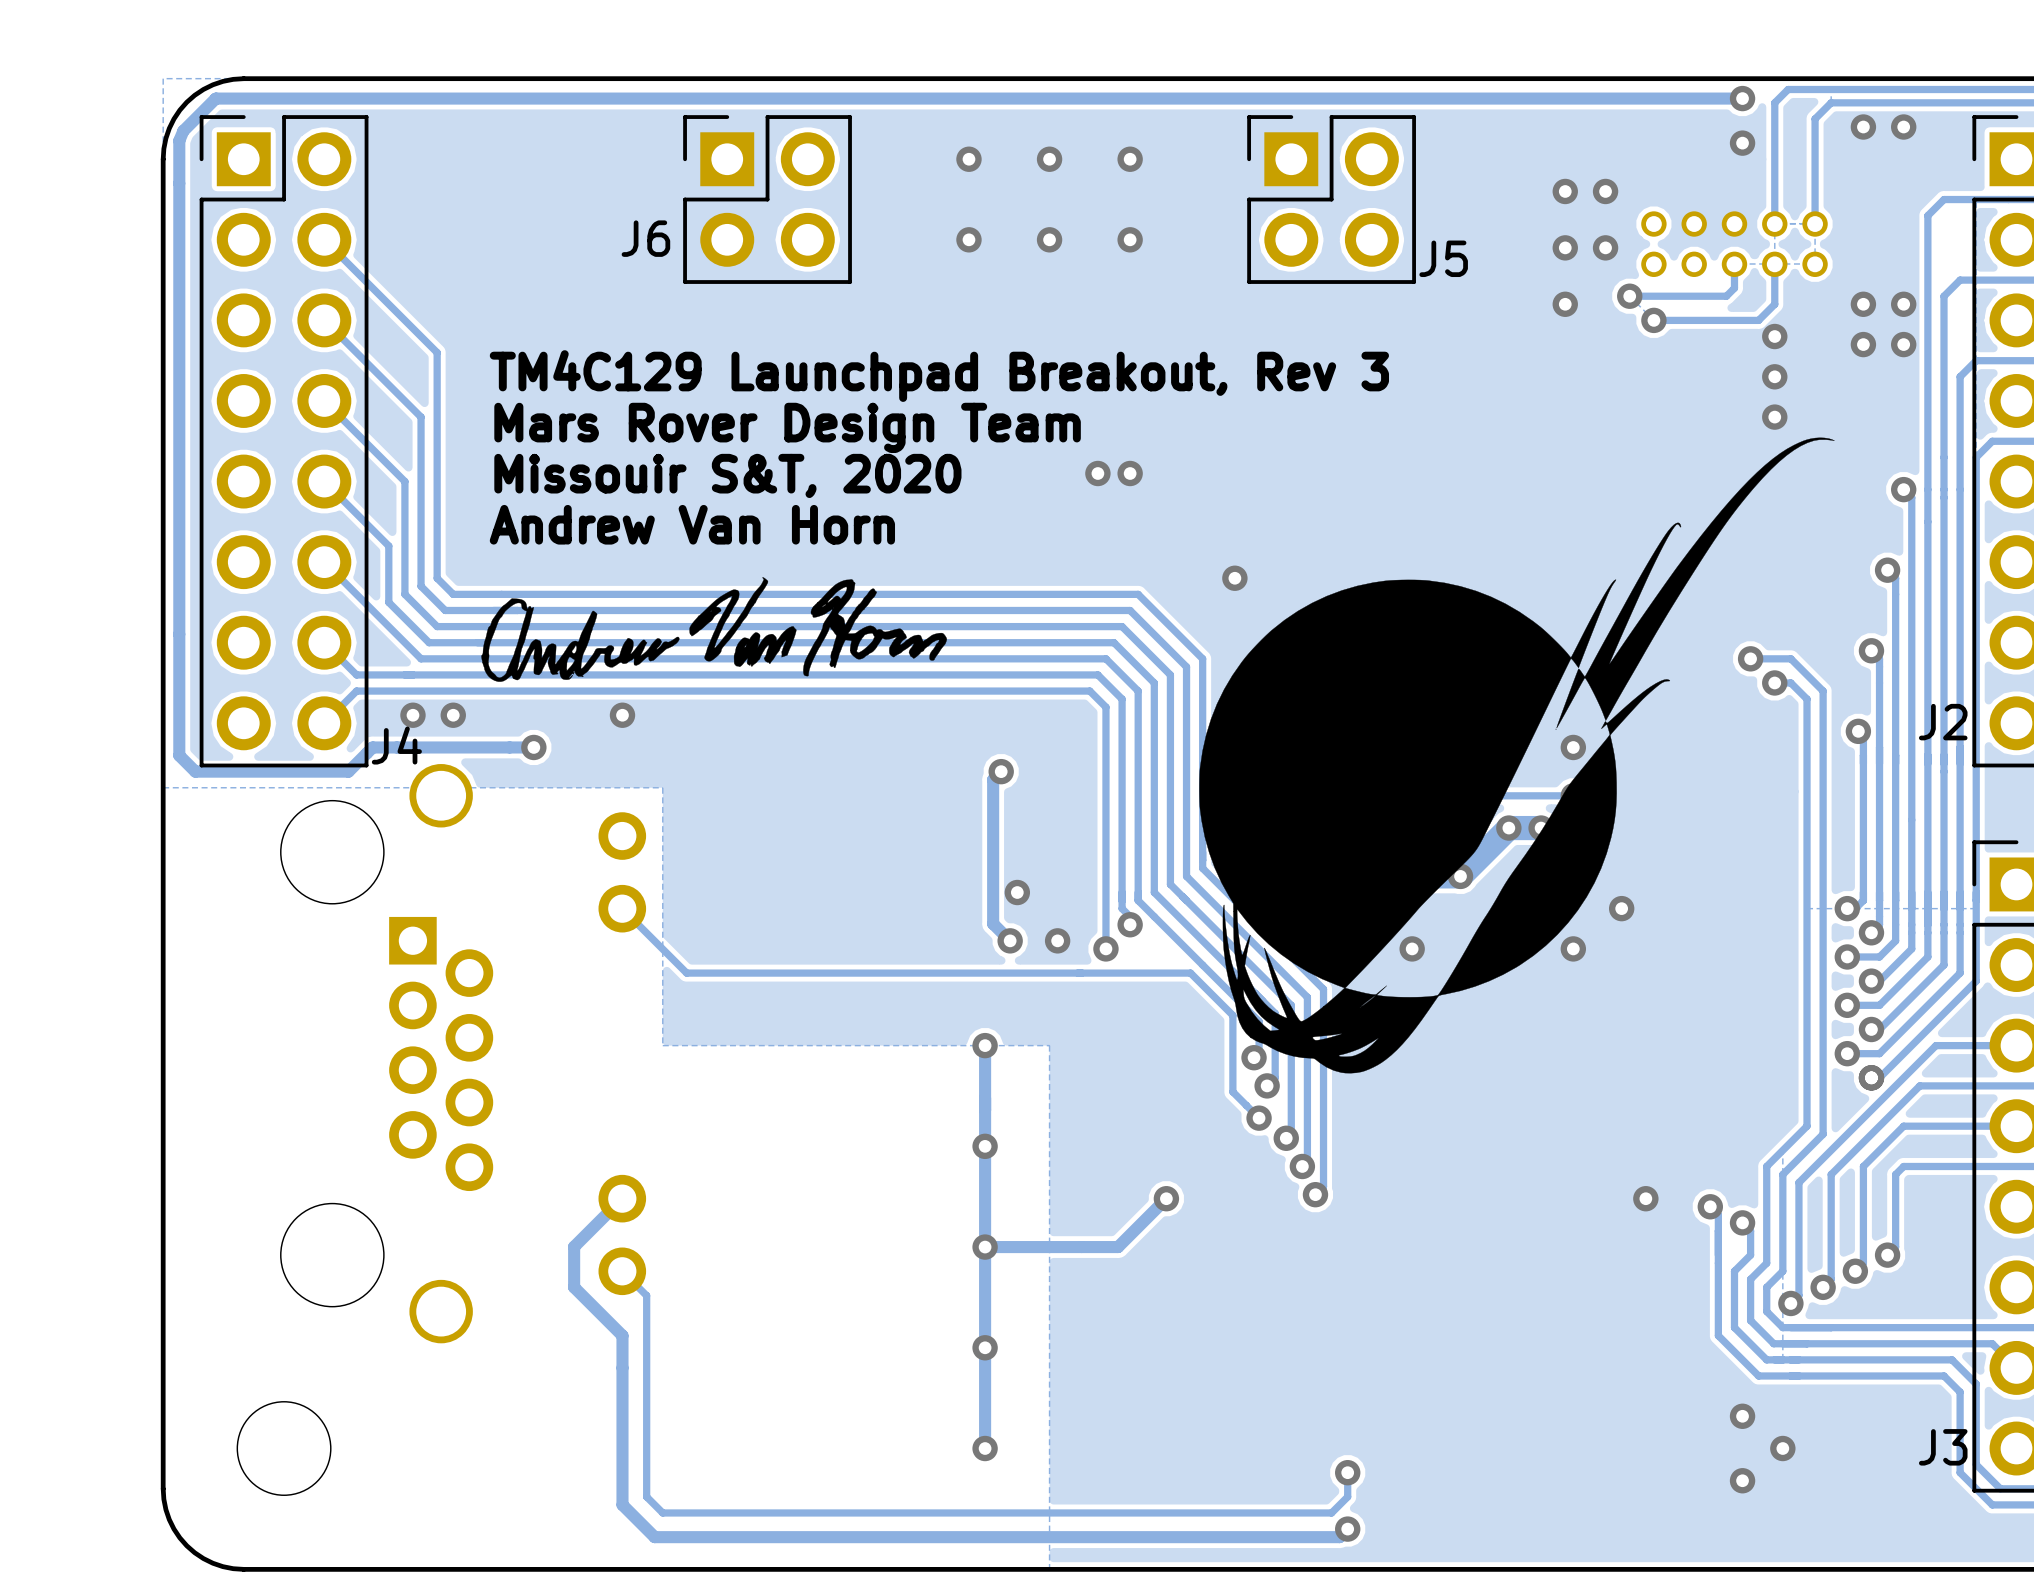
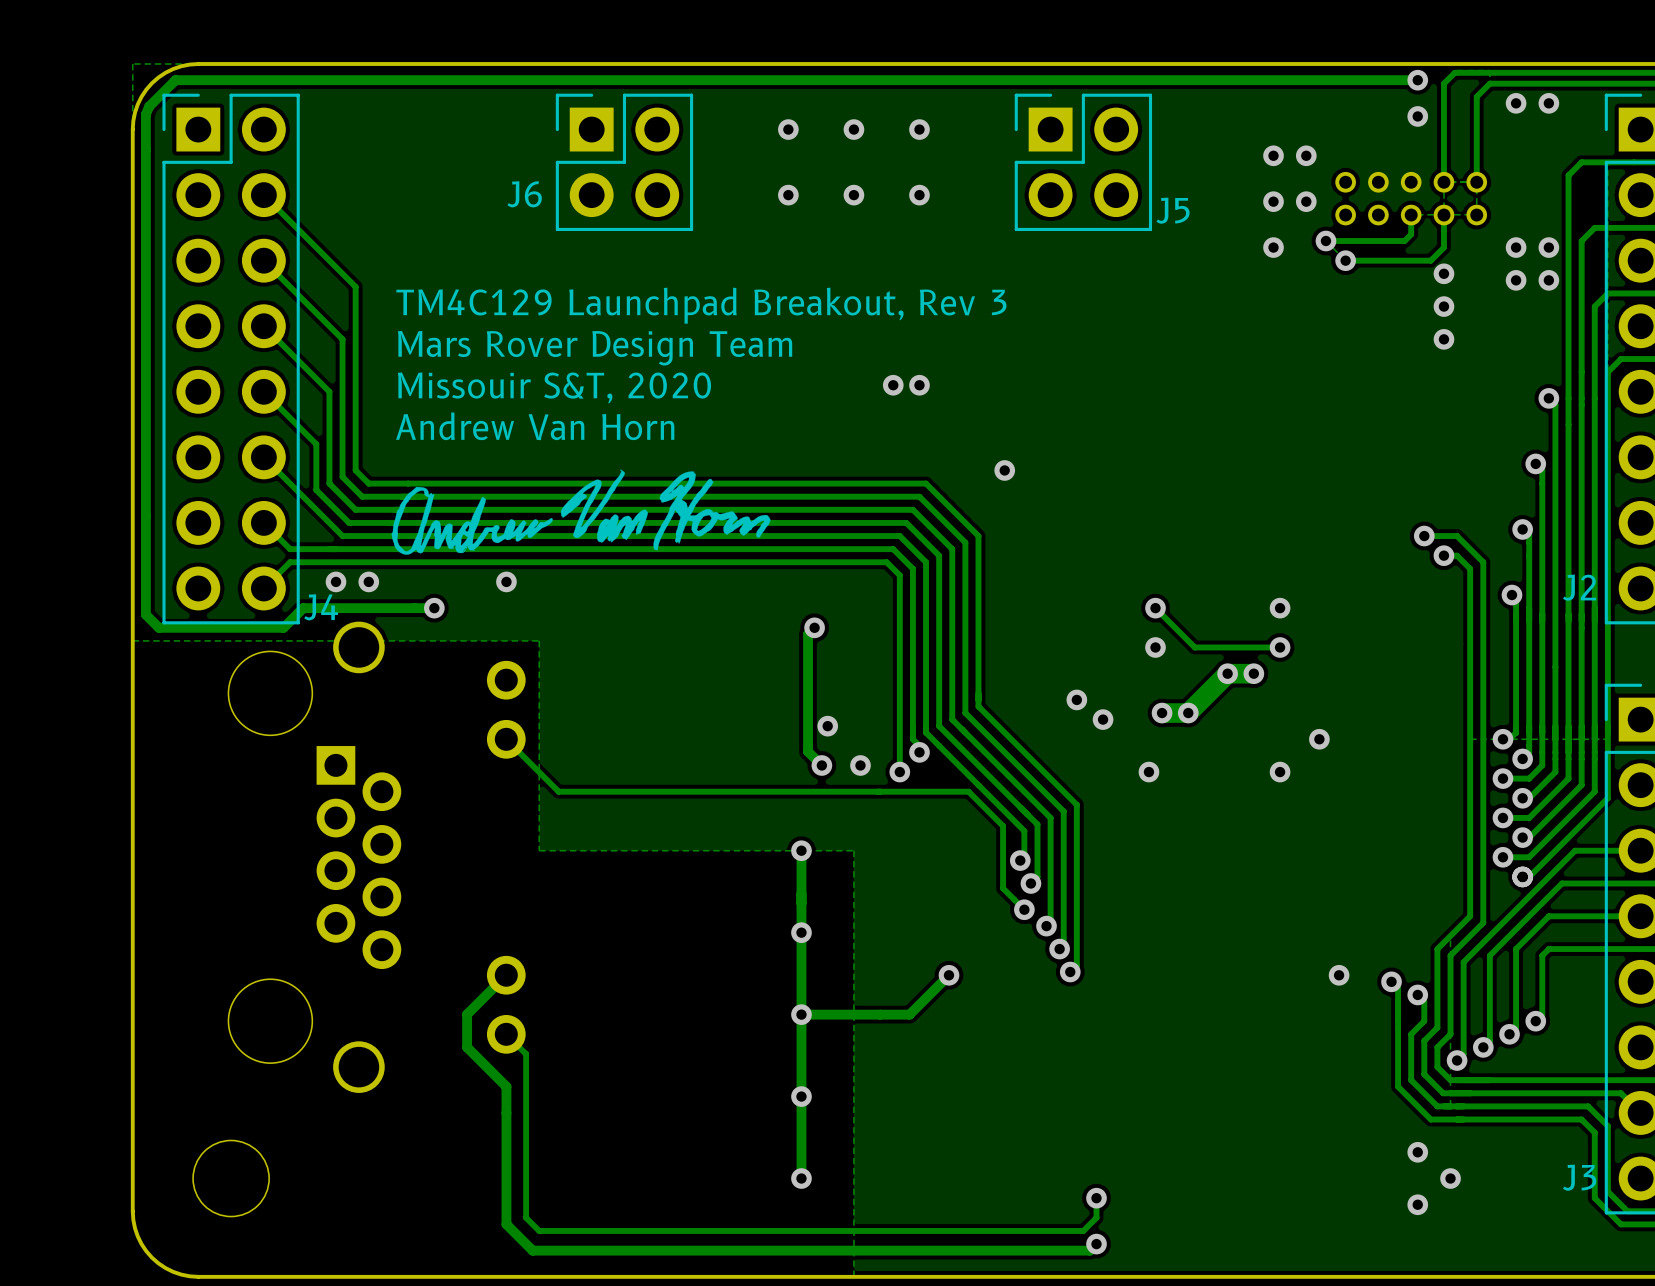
drawing: [1199, 437, 1835, 1074] -> none

